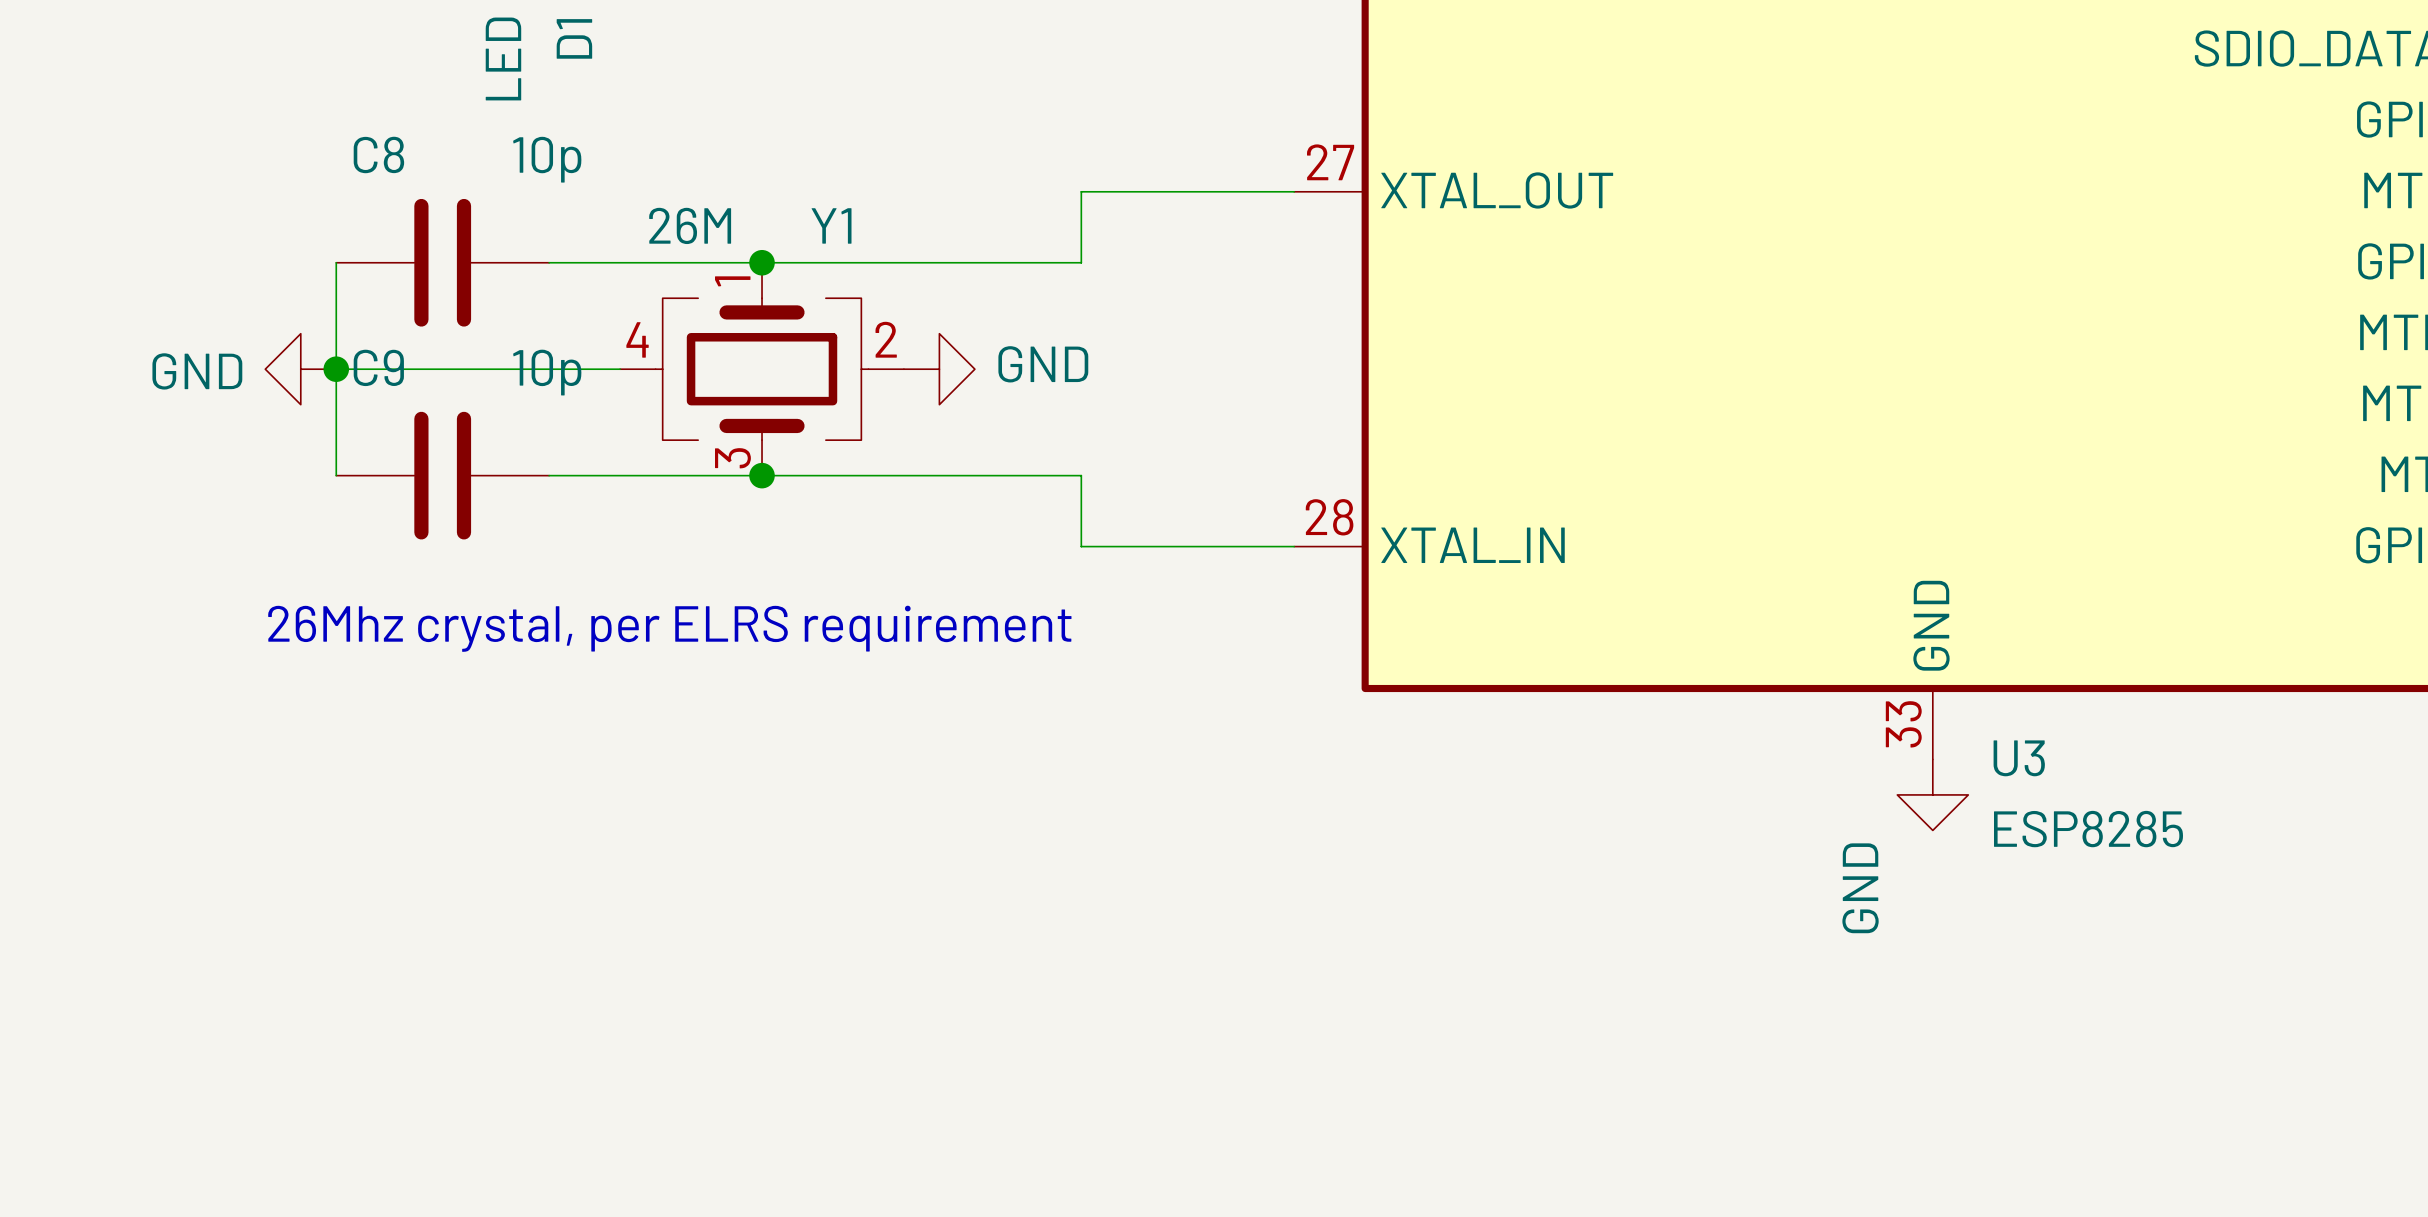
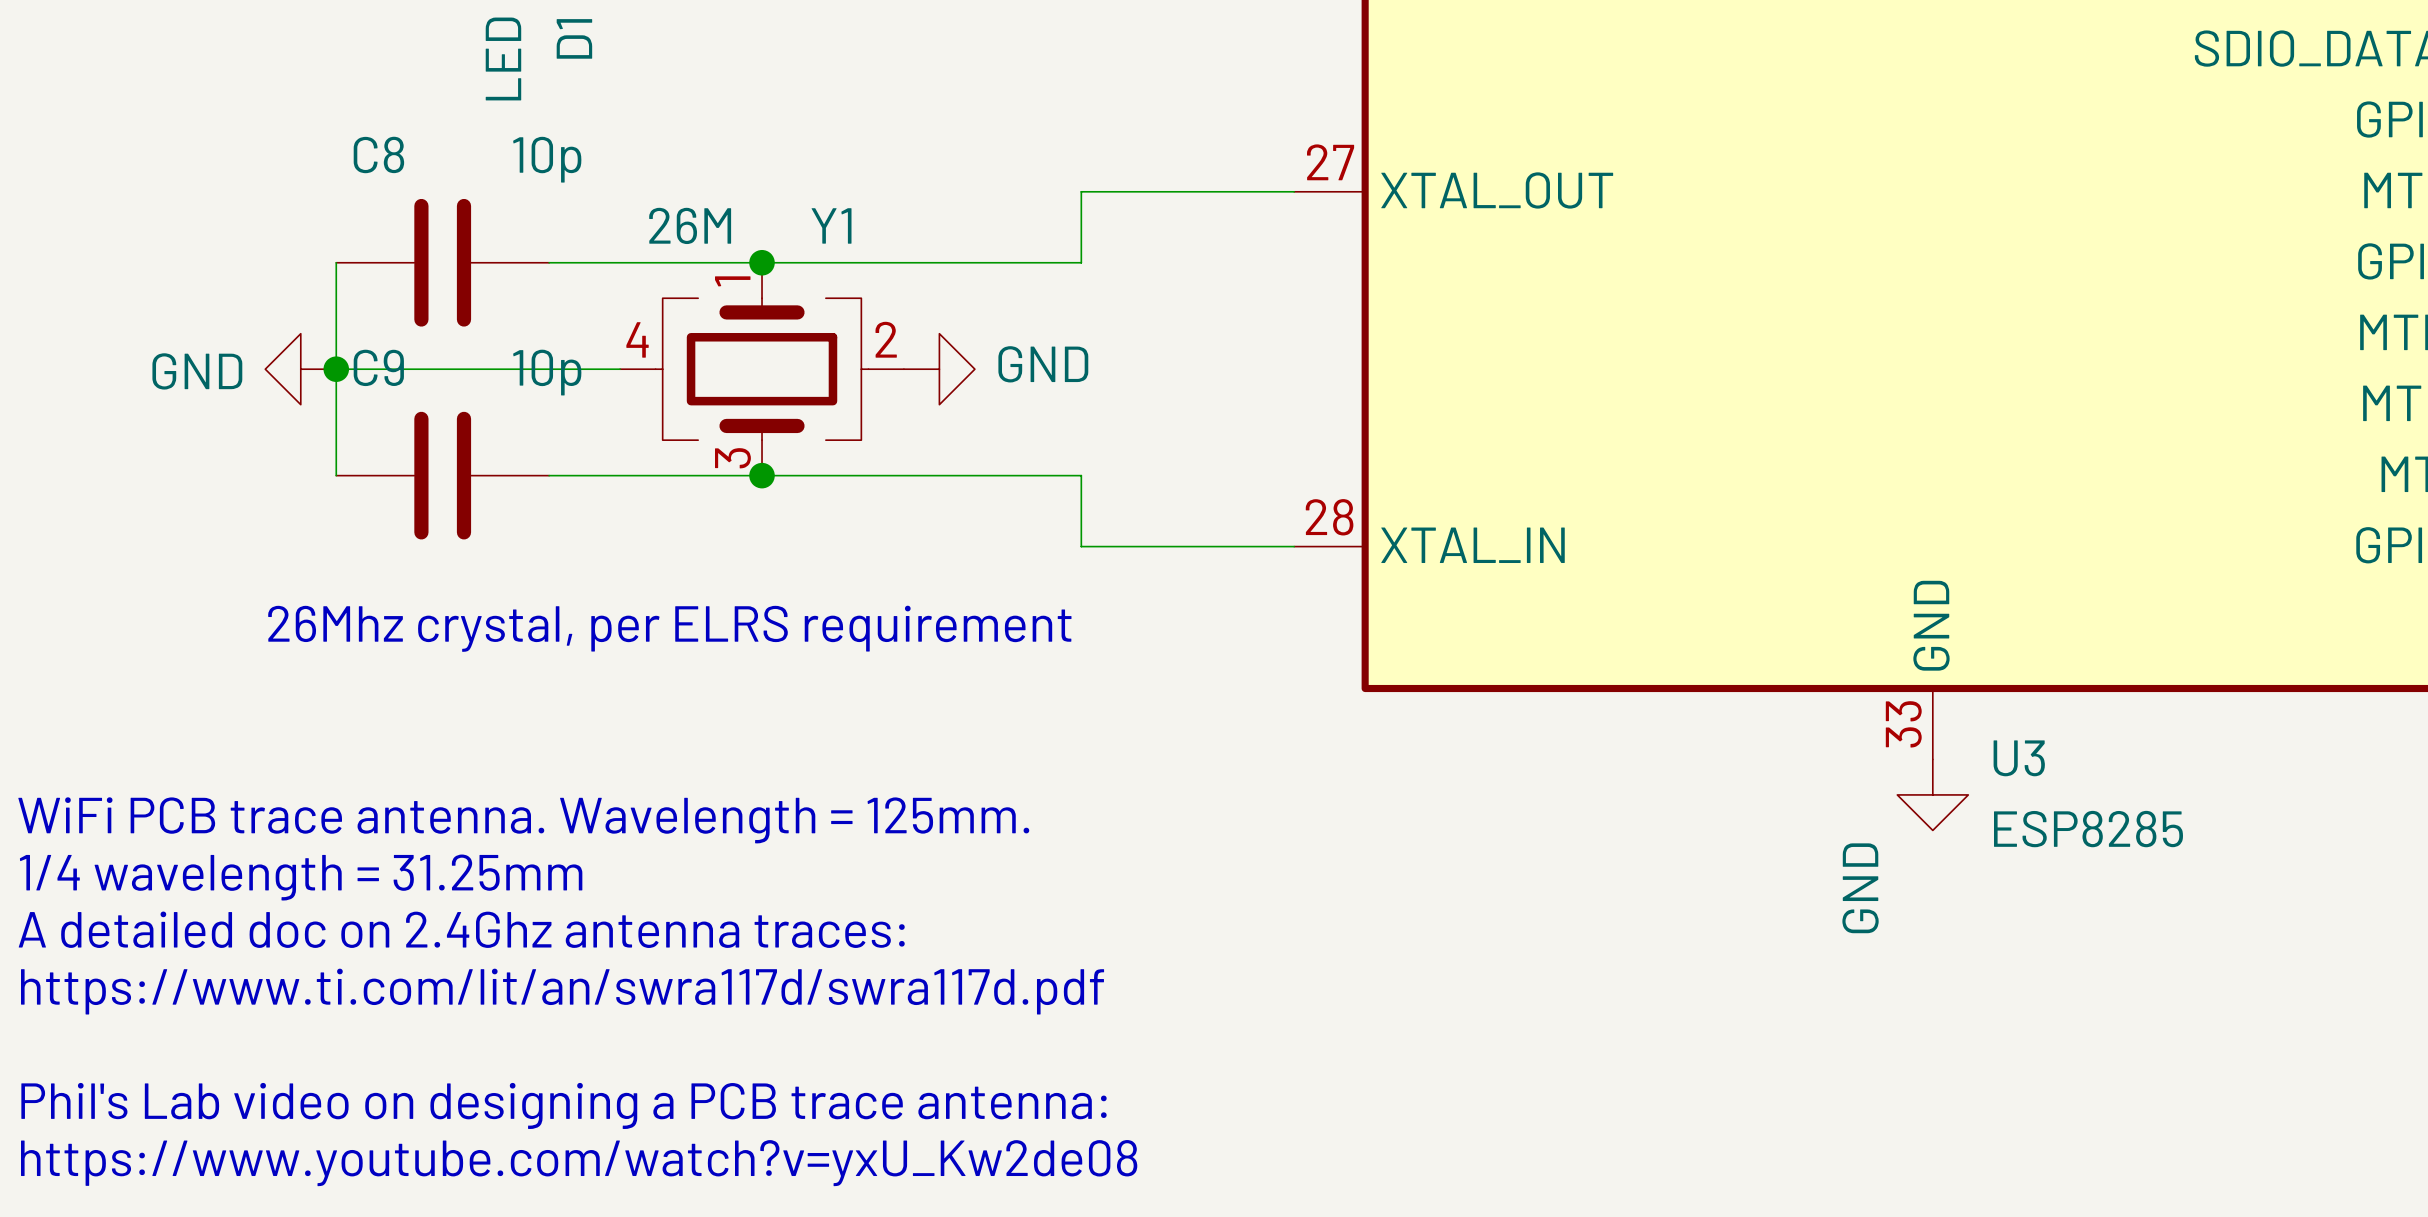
text: none -> WiFi PCB trace antenna. Wavelength = 125mm. (523, 820)
text: none -> 1/4 wavelength = 31.25mm (301, 877)
text: none -> A detailed doc on 2.4Ghz antenna traces: (461, 929)
text: none -> https://www.ti.com/lit/an/swra117d/swra117d.pdf (562, 991)
text: none -> Phil's Lab video on designing a PCB trace antenna: (564, 1105)
text: none -> https://www.youtube.com/watch?v=yxU_Kw2de08 (579, 1163)

